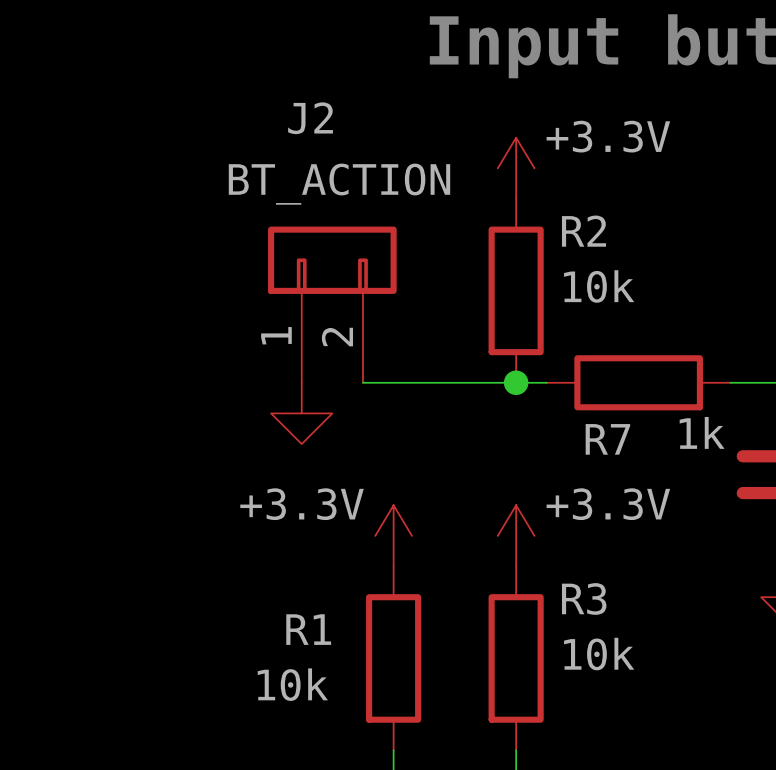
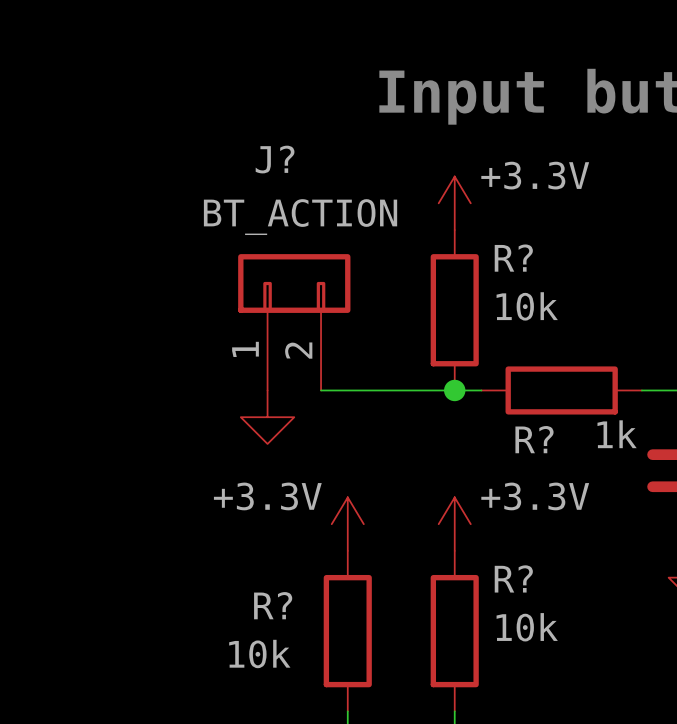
J2 name: J2 (310, 118) -> J? (275, 159)
R2 name: R2 (583, 231) -> R? (513, 258)
R7 name: R7 (607, 439) -> R? (534, 439)
R3 name: R3 (584, 598) -> R? (513, 578)
R1 name: R1 (308, 629) -> R? (273, 605)

